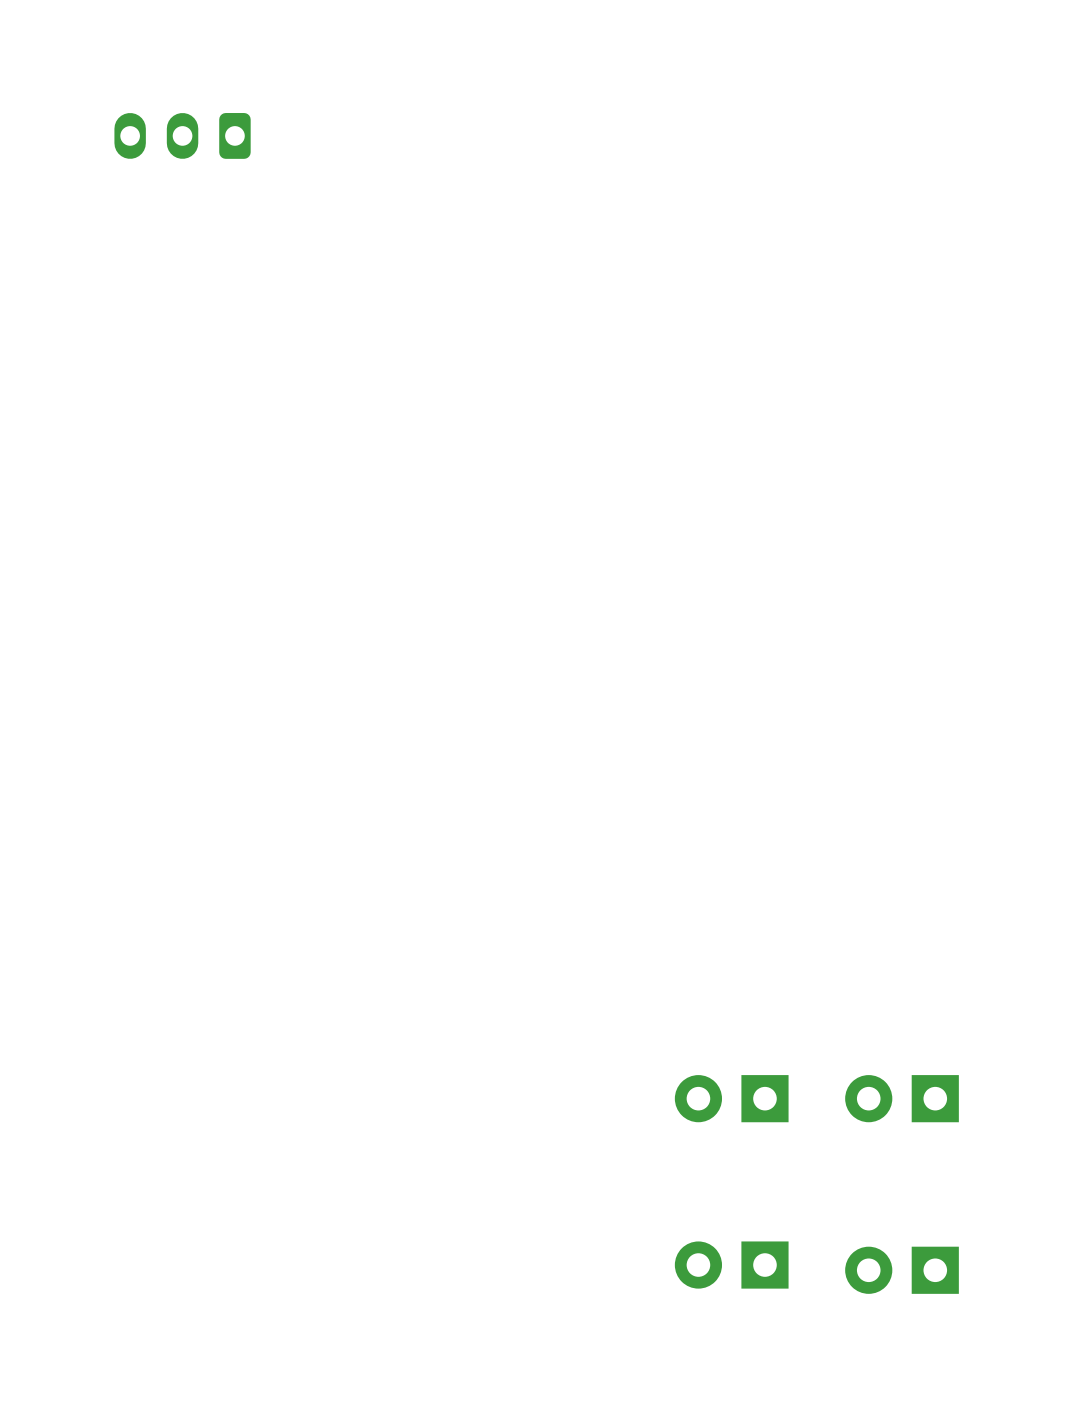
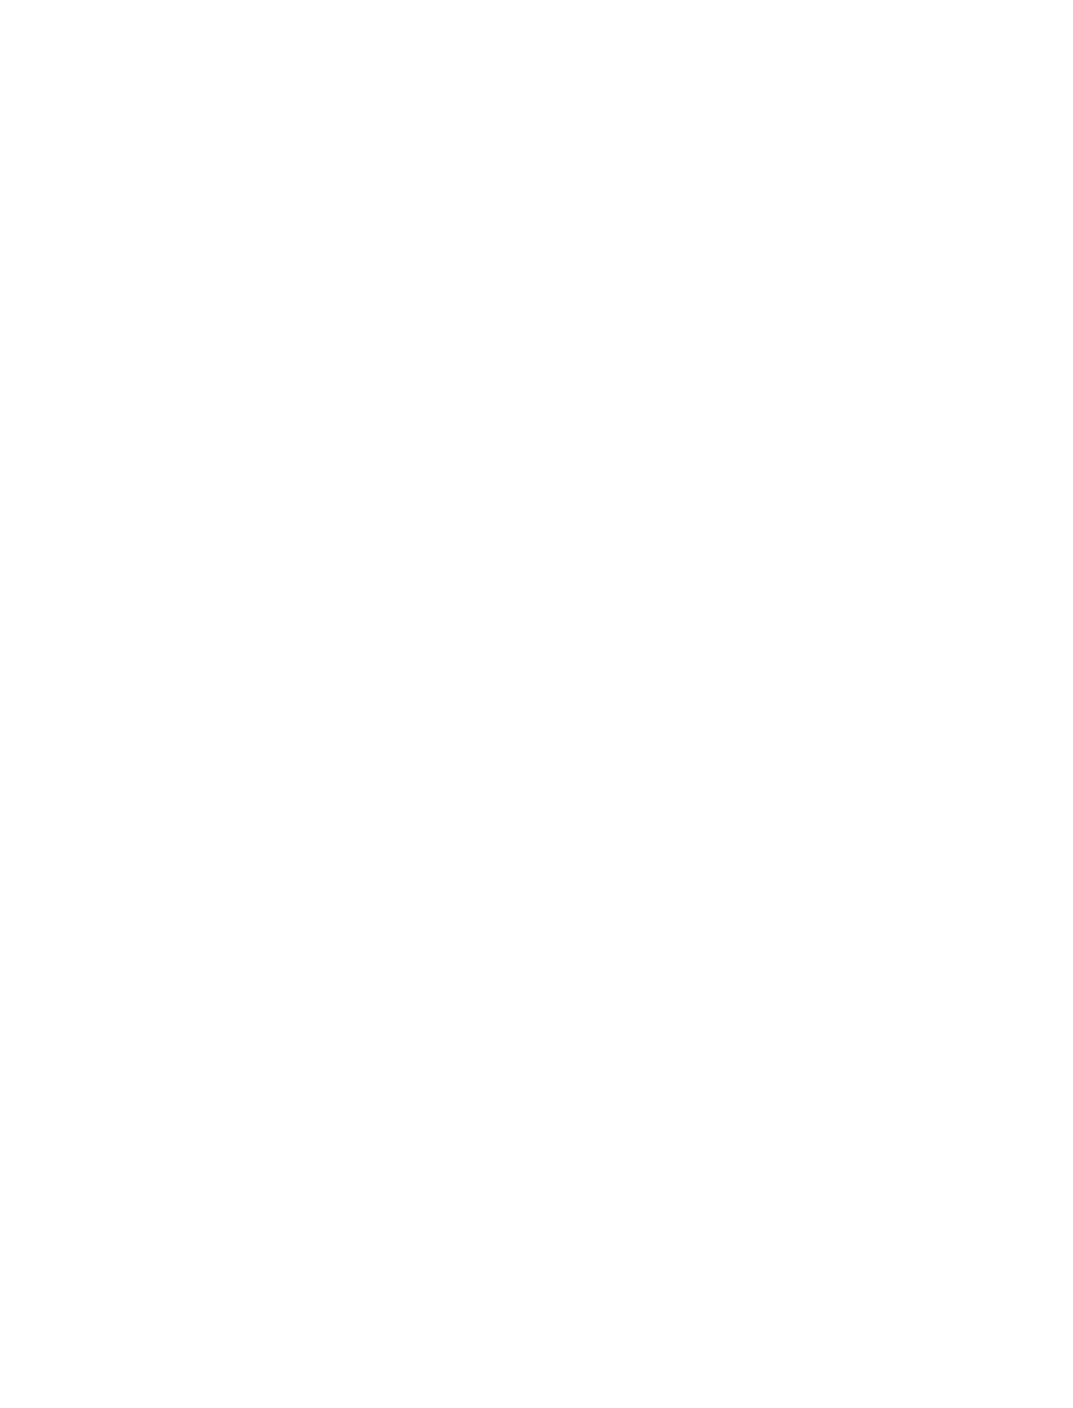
part: (182, 135) -> none
part: (731, 1098) -> none
part: (902, 1098) -> none
part: (731, 1265) -> none
part: (902, 1270) -> none

